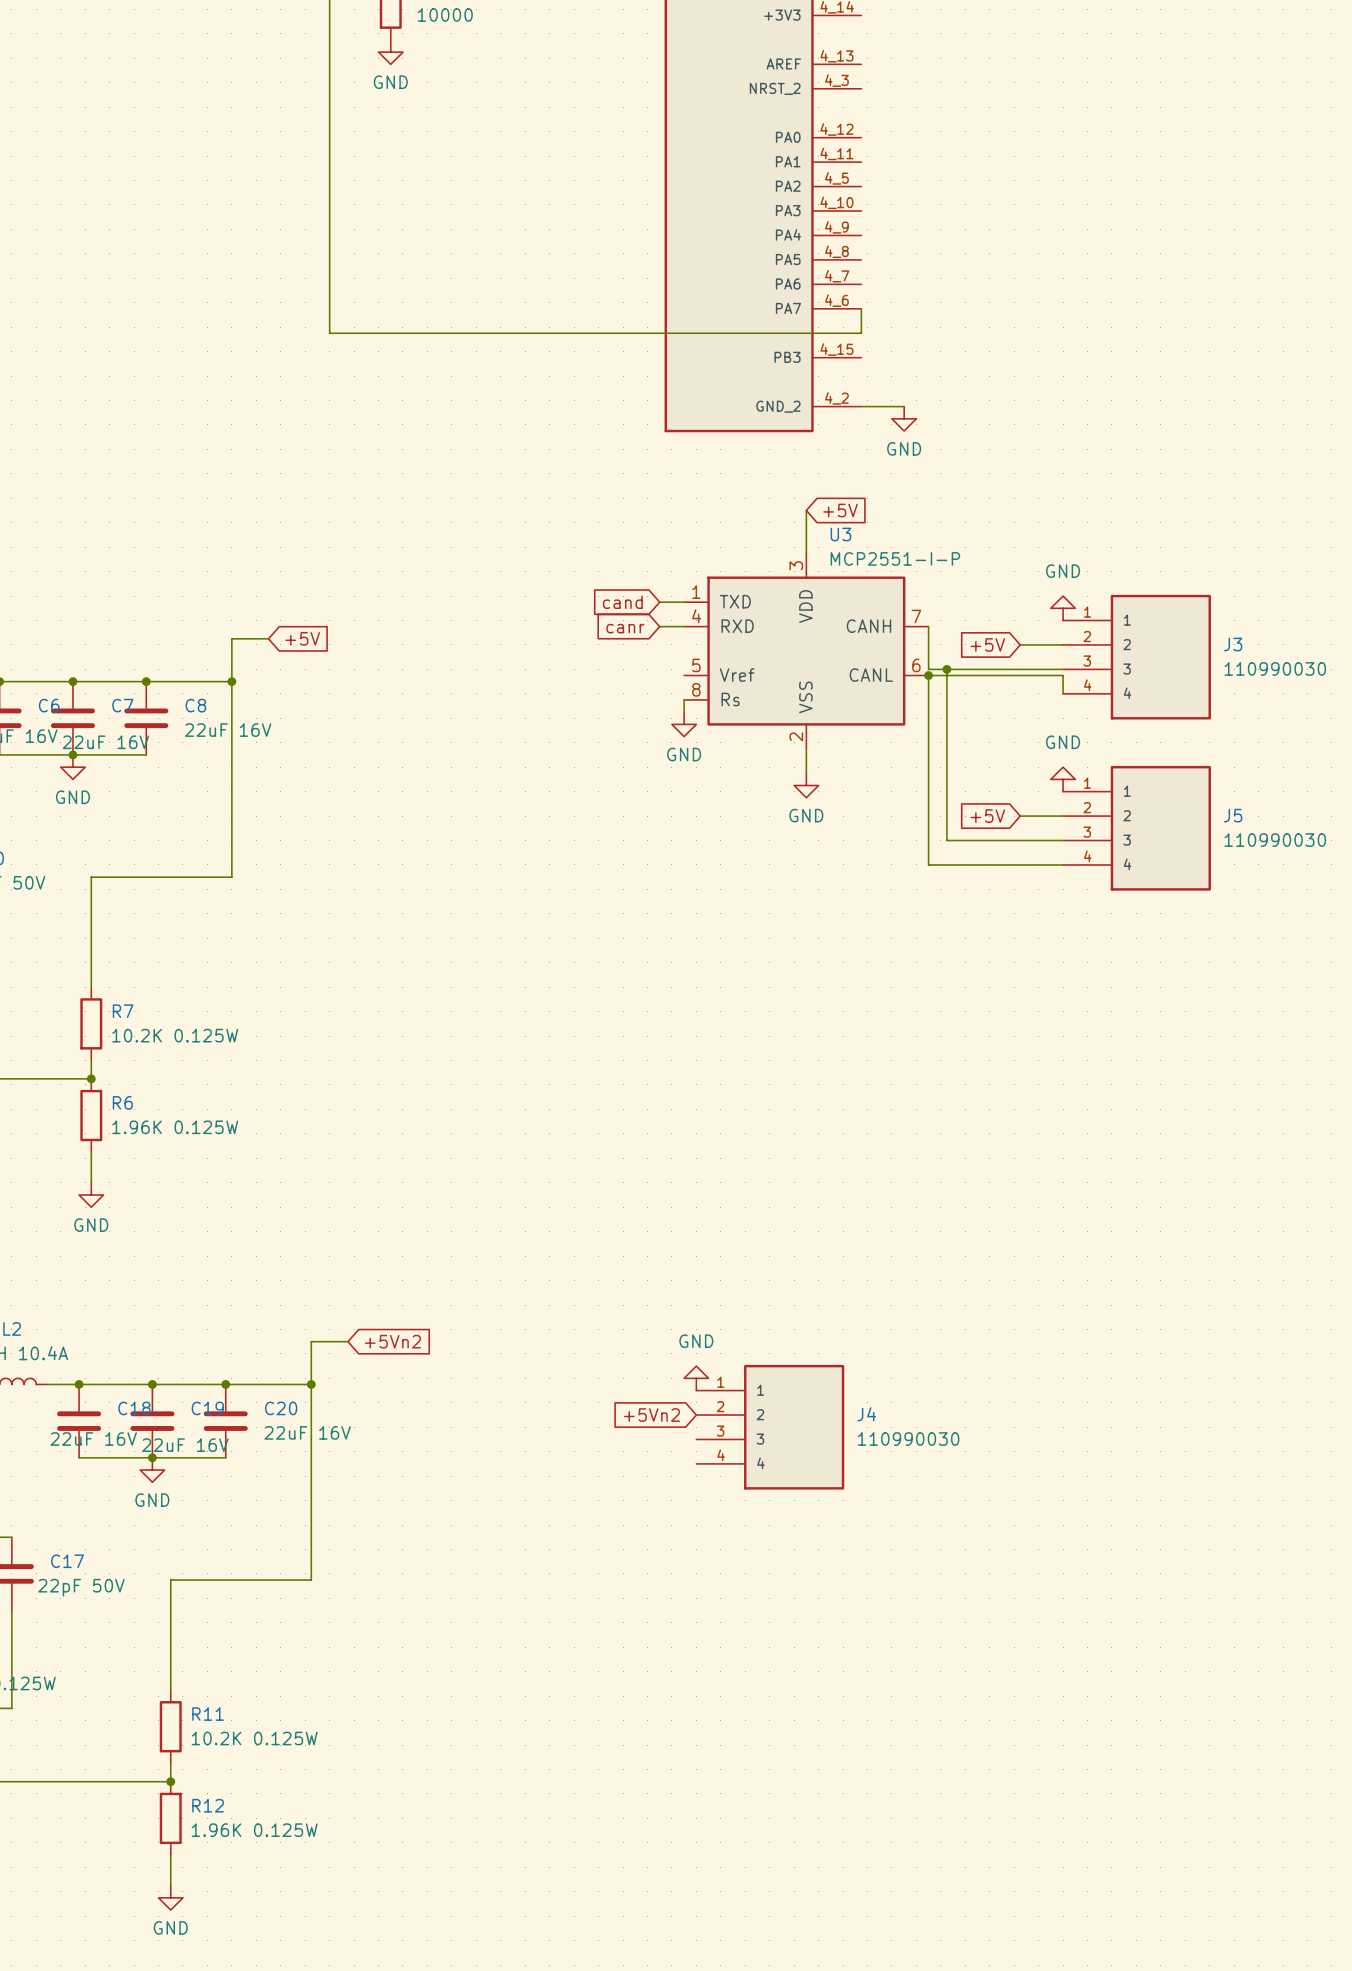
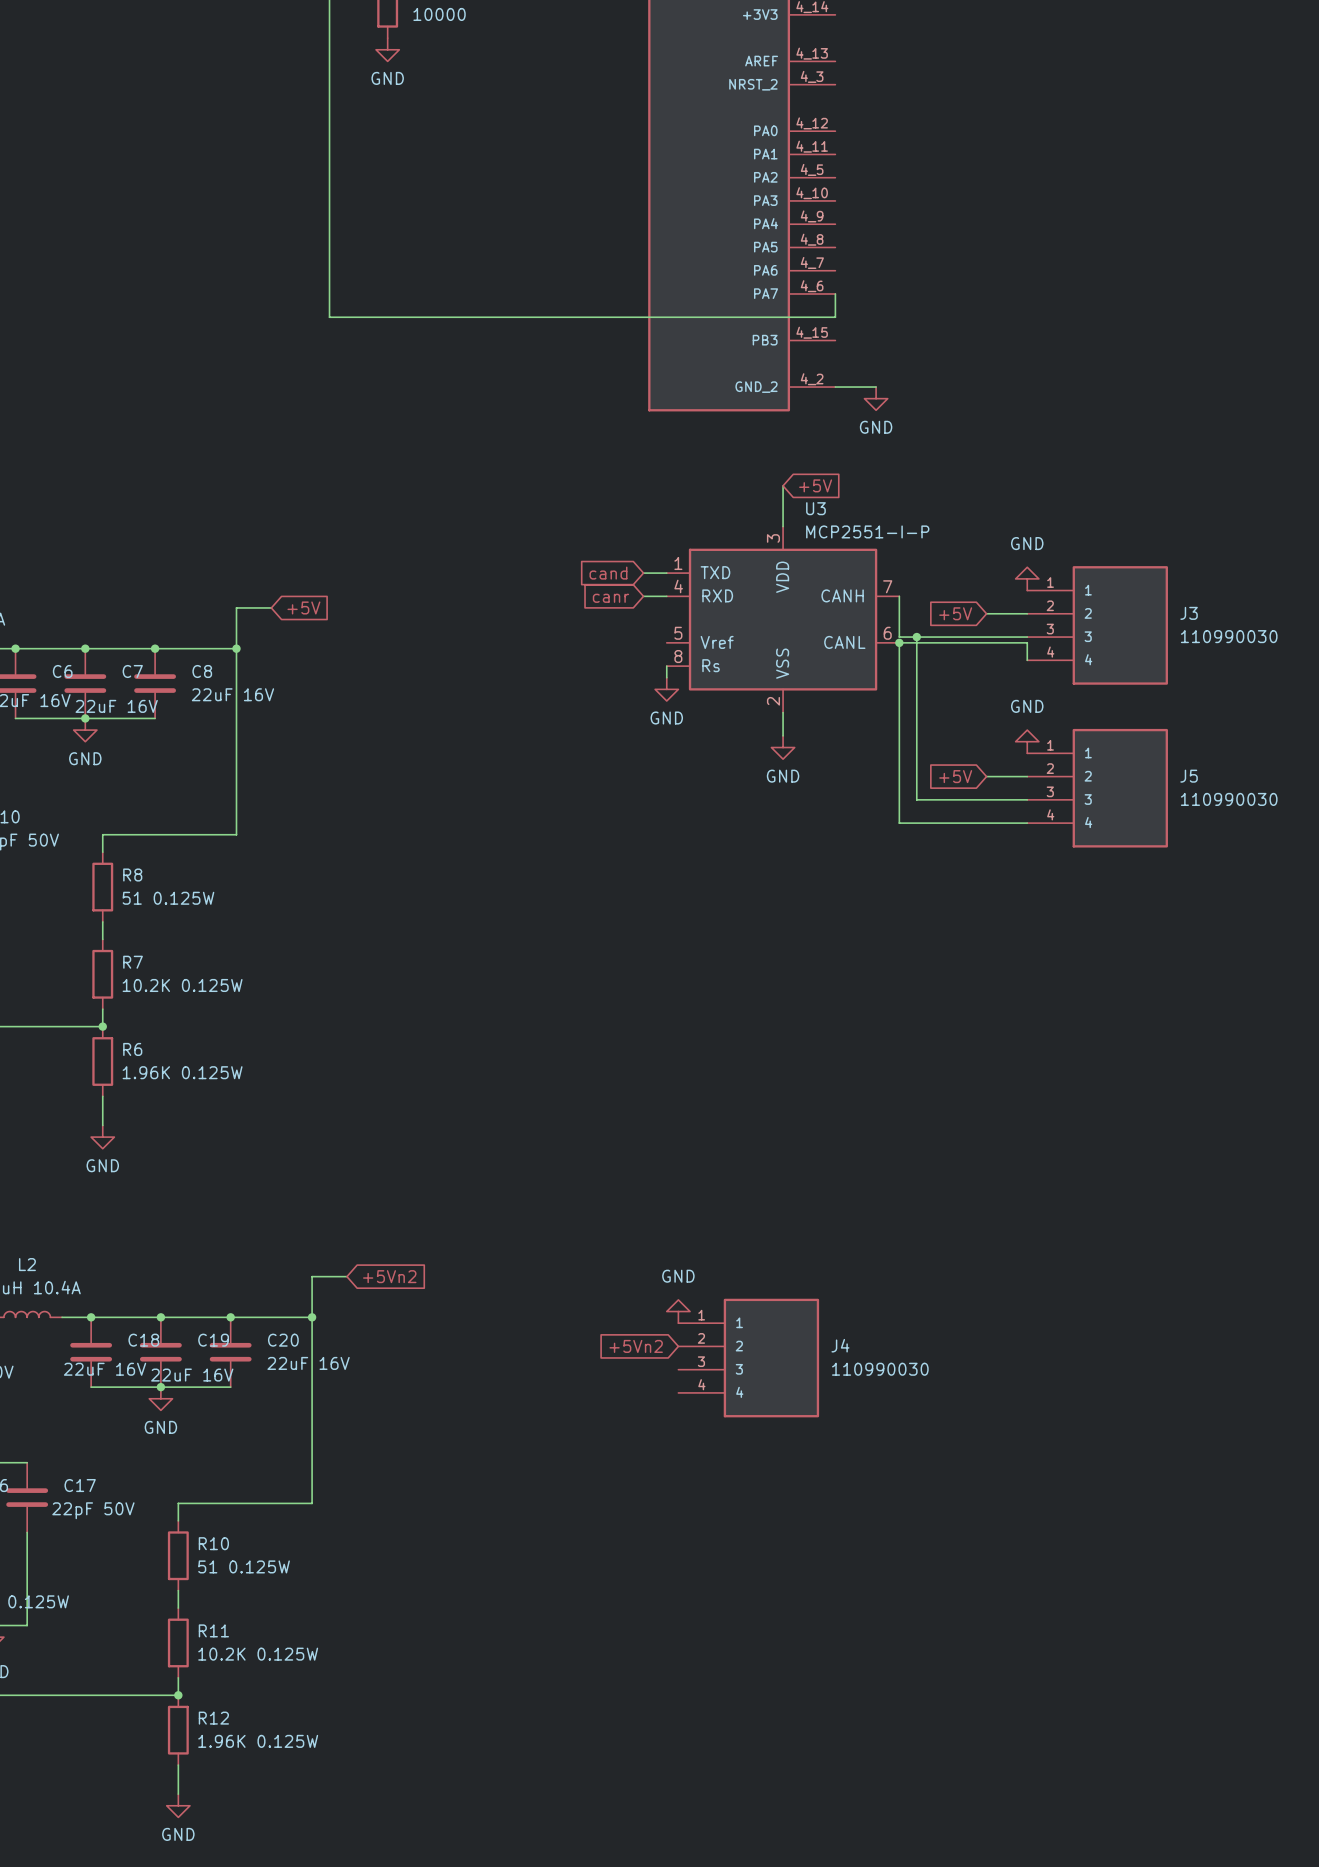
wire: (91, 895) (91, 968) -> none
R8: none -> 51 0.125W (102, 887)
wire: (170, 1598) (170, 1671) -> none
R10: none -> 51 0.125W (178, 1555)

